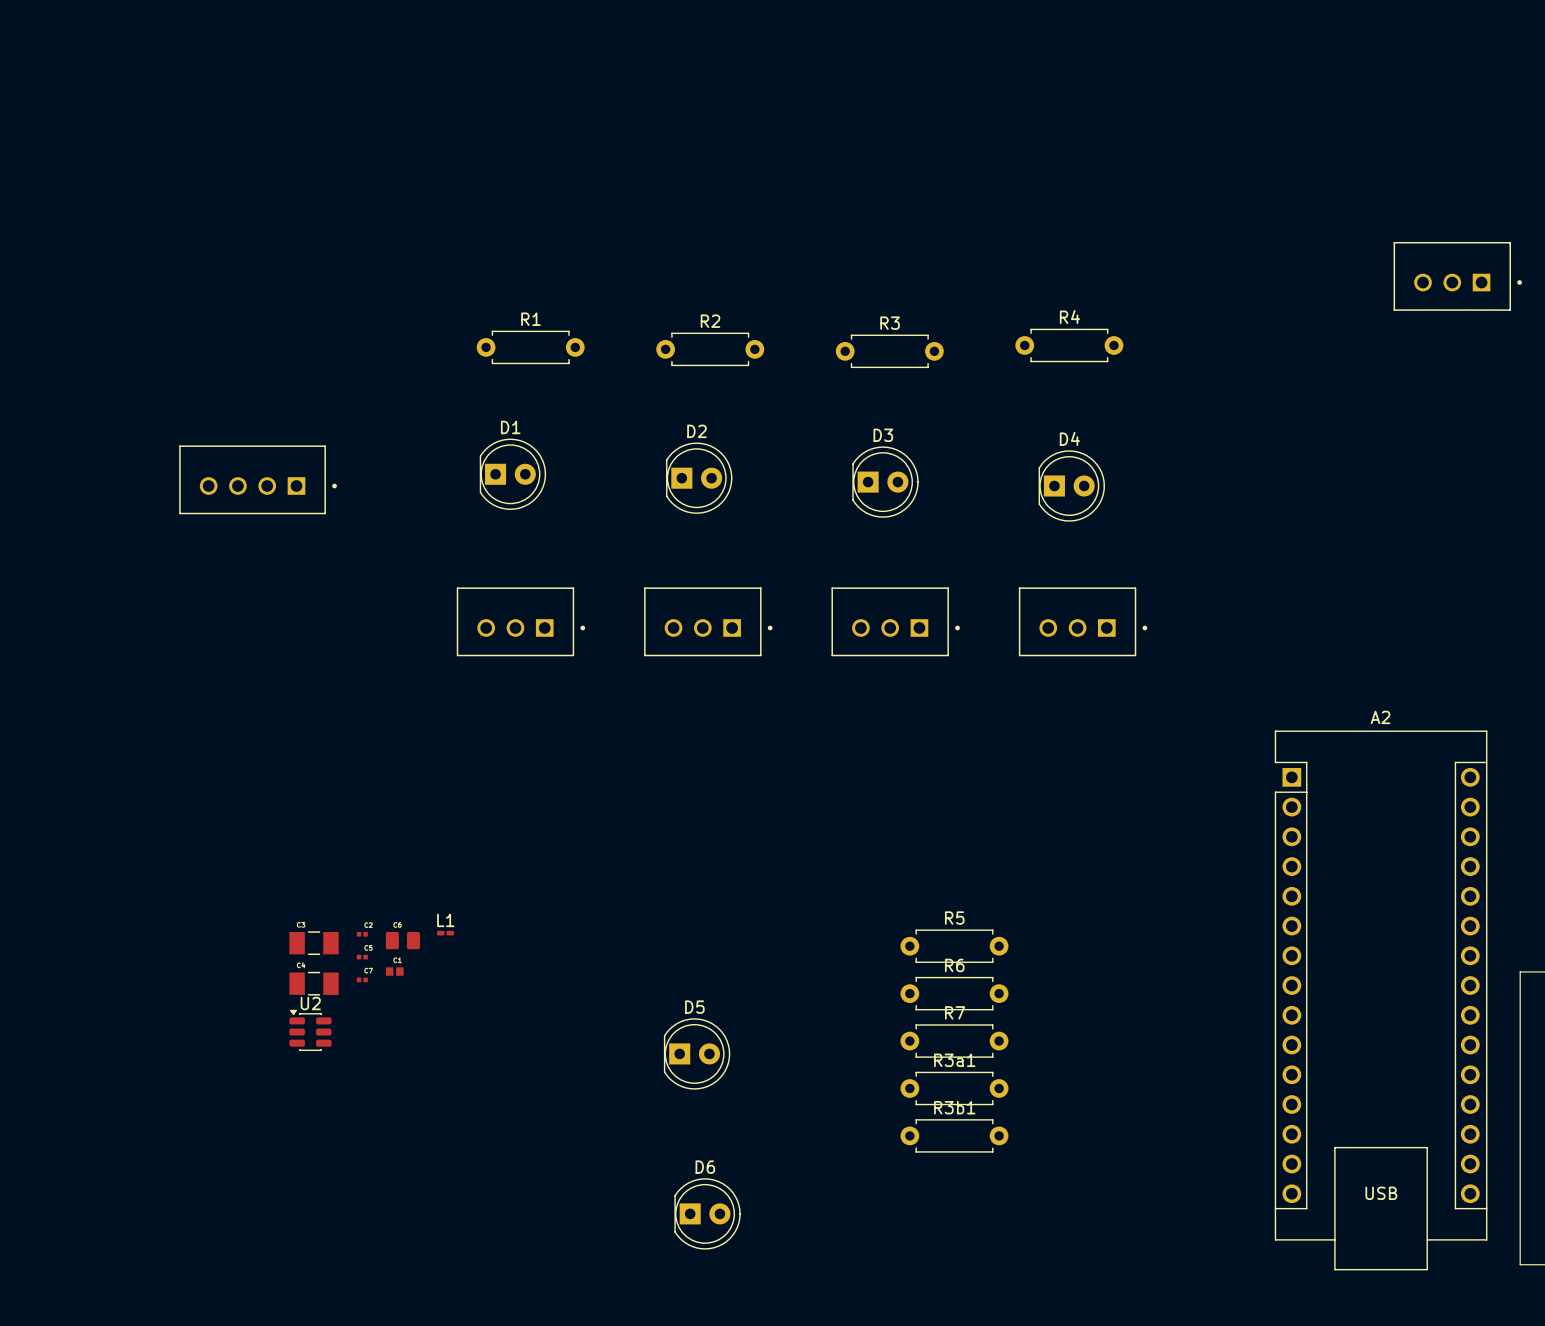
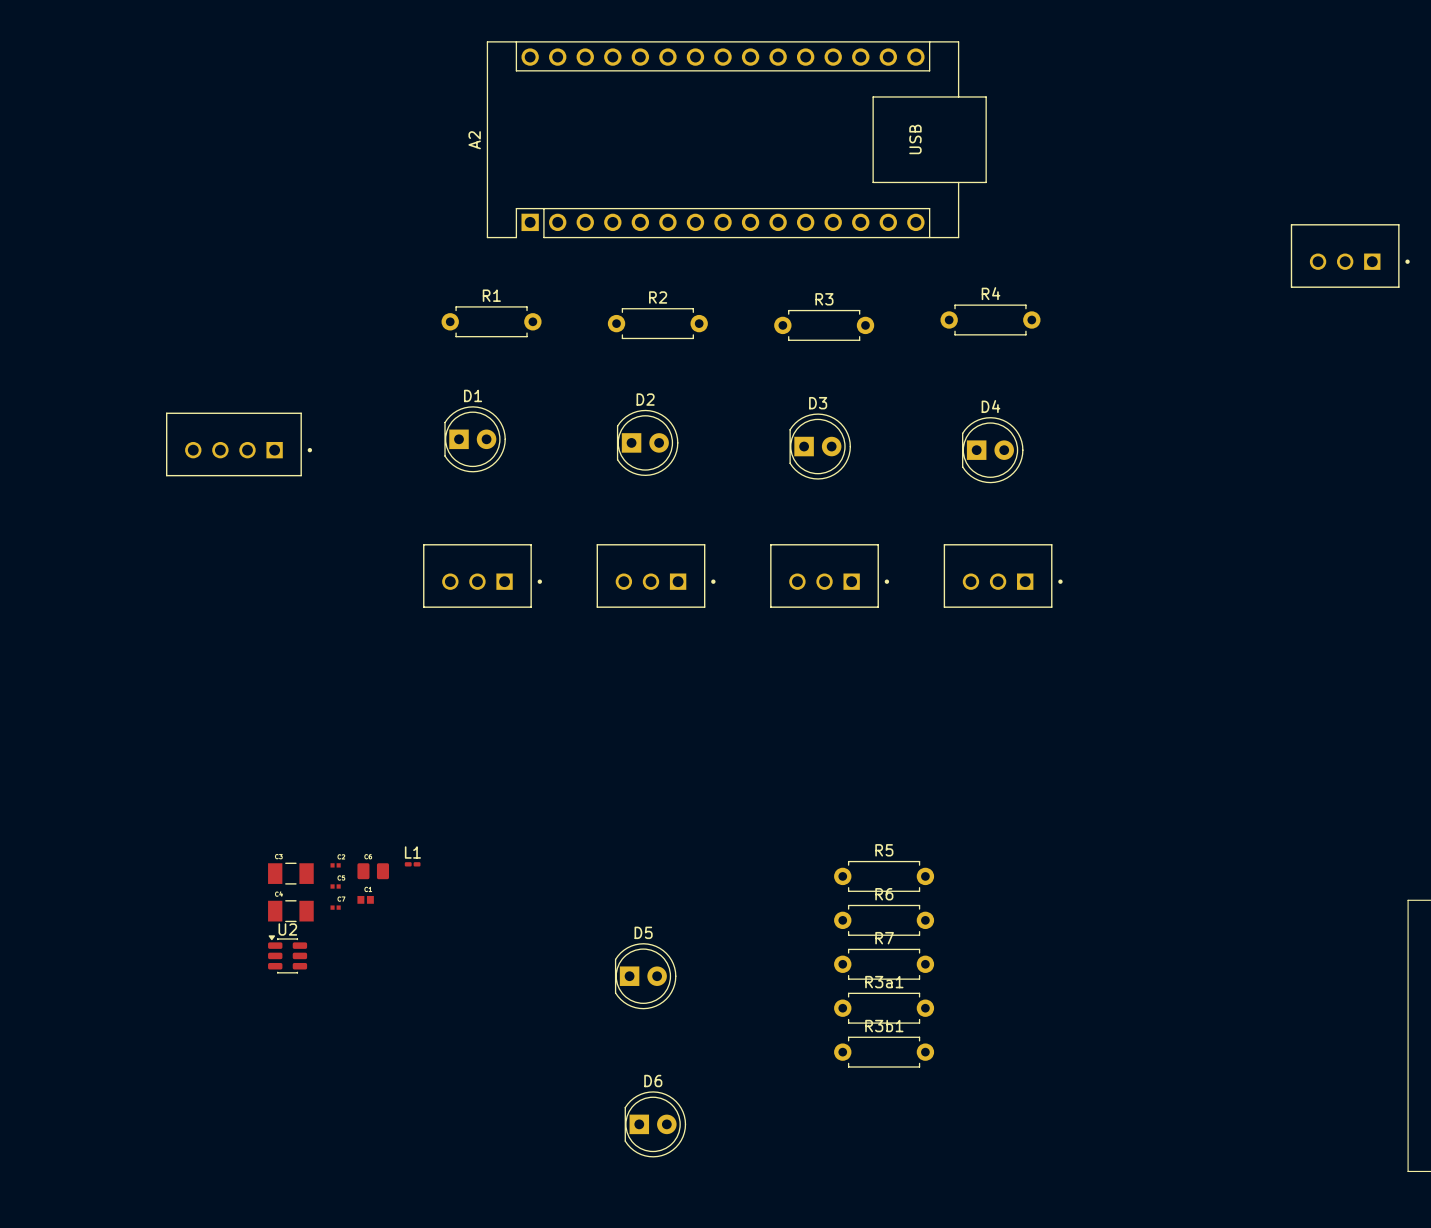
A2 rotation: 0° (1381, 1000) -> 90° counterclockwise (736, 139)
A2 position: (1381, 1000) -> (736, 139)

